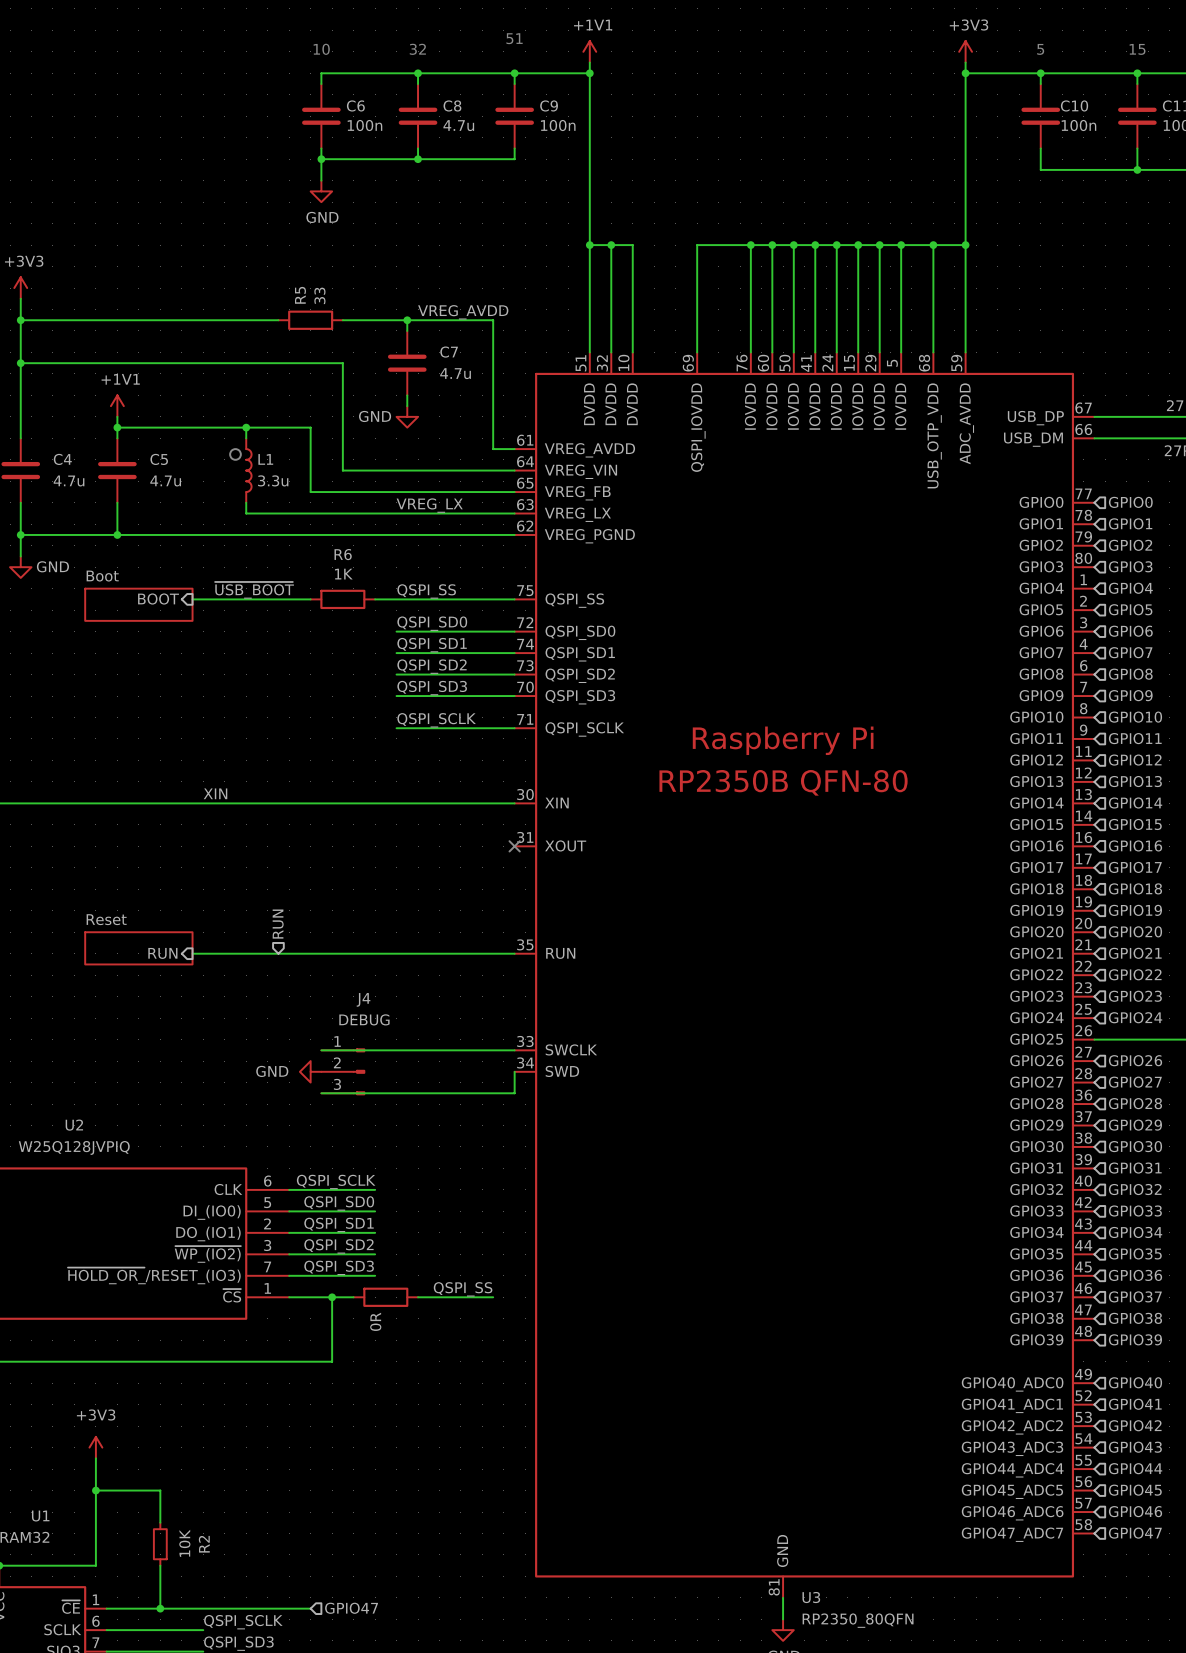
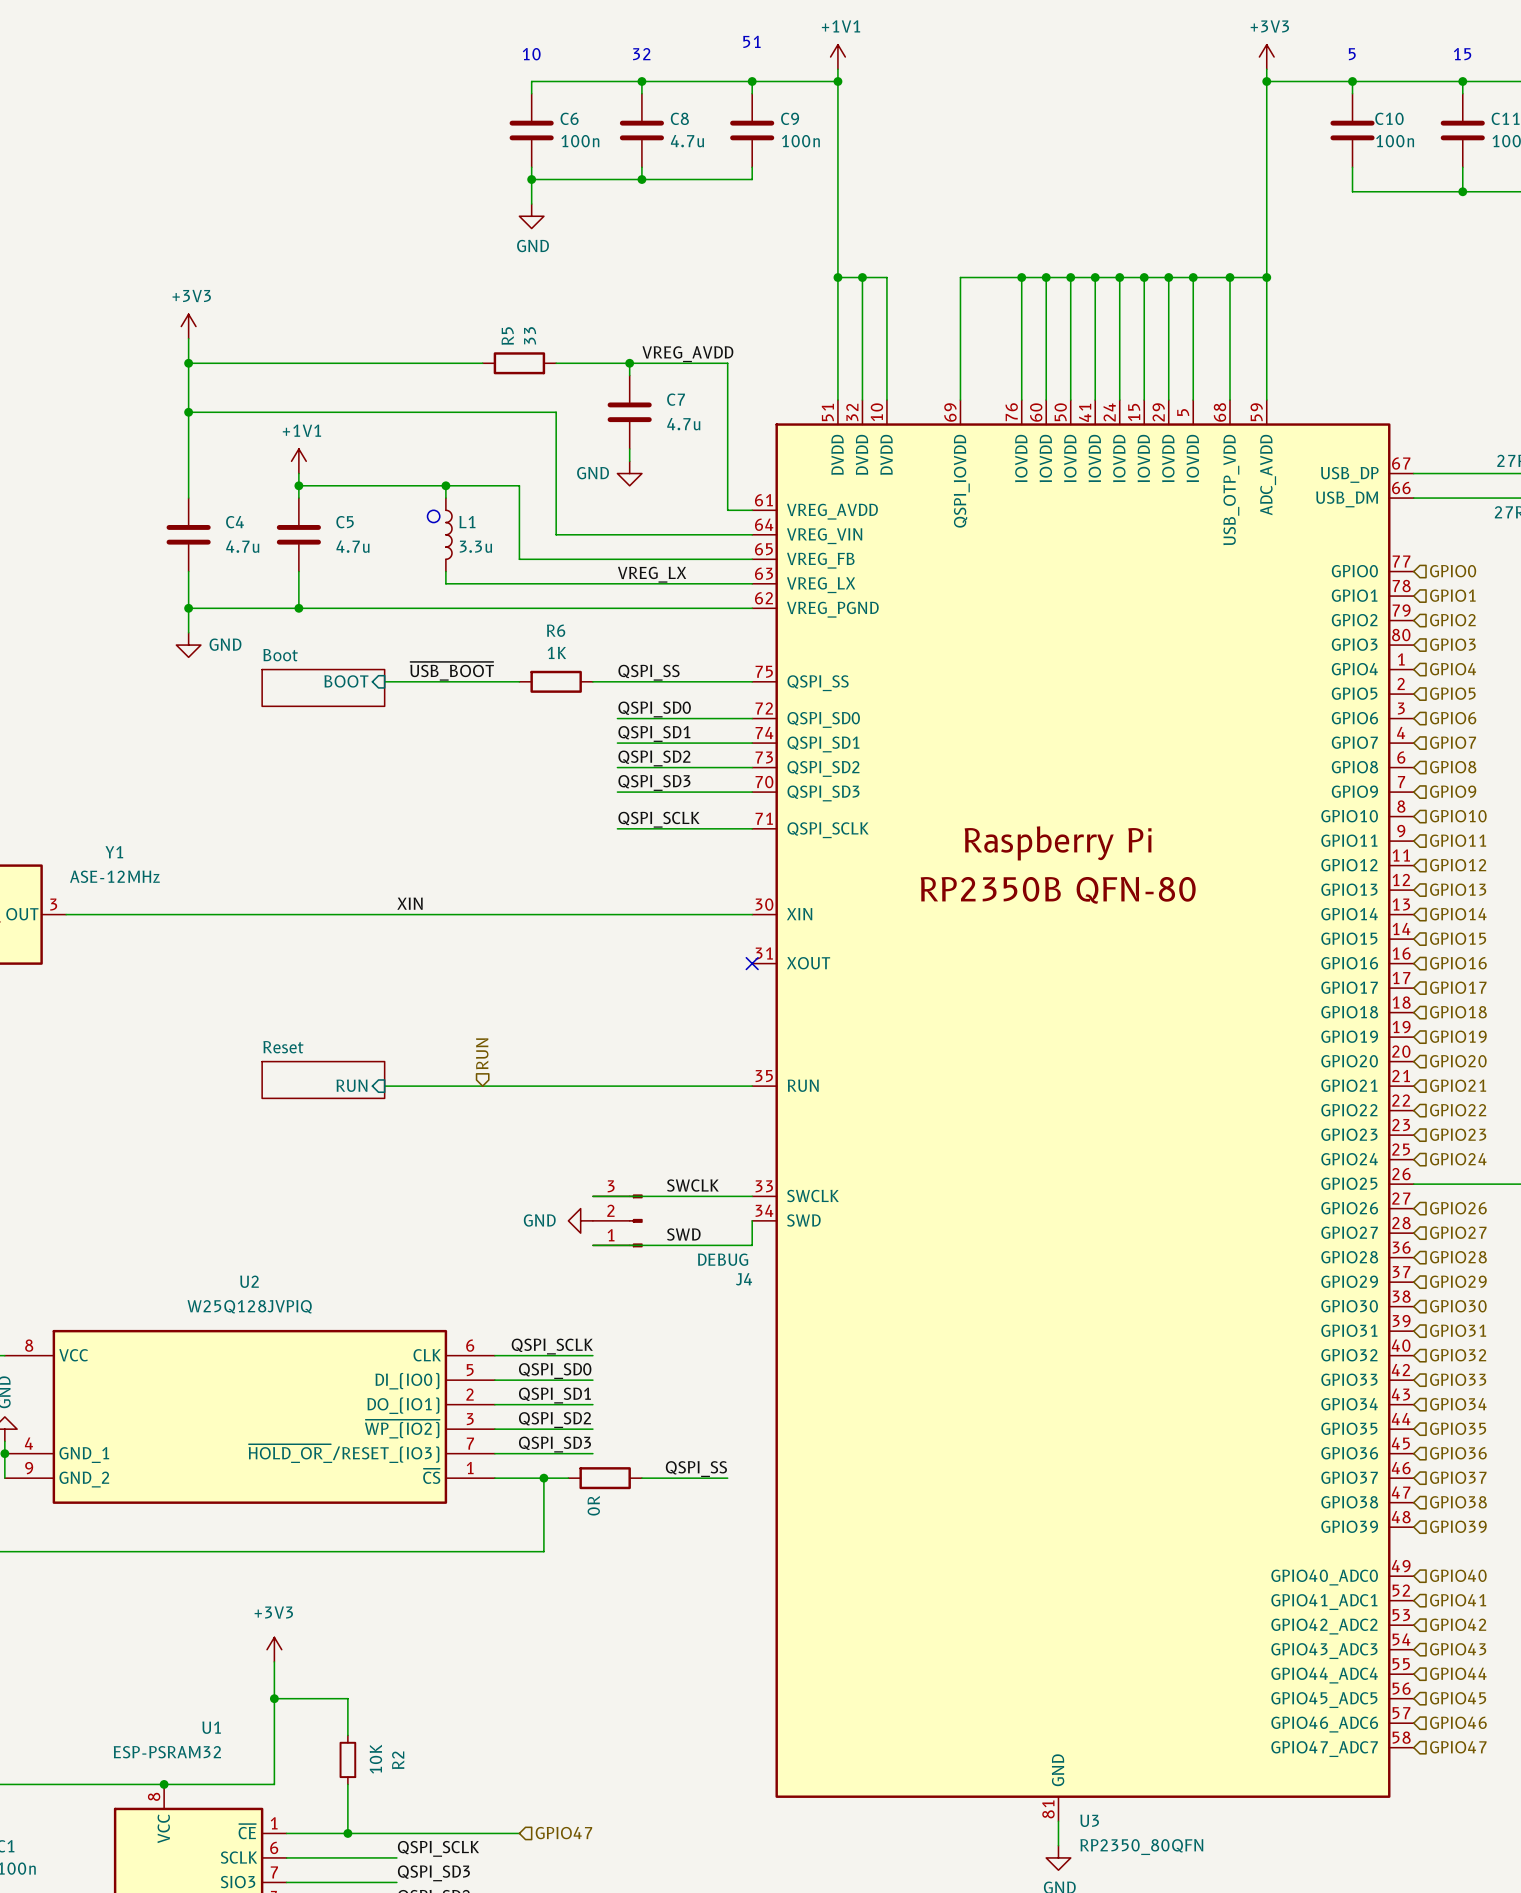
J4 name position: J4 (363, 999) -> J4 (744, 1279)
J4 value position: DEBUG (364, 1019) -> DEBUG (723, 1259)
label: none -> SWCLK (692, 1185)
wire: (321, 1050) (375, 1050) -> none
power symbol position: GND (310, 1071) -> GND (580, 1220)
J4 position: (343, 1071) -> (617, 1220)
J4 flip: as is (358, 1071) -> up-down (635, 1220)
label: none -> SWD (683, 1234)
wire: (321, 1093) (375, 1093) -> none

